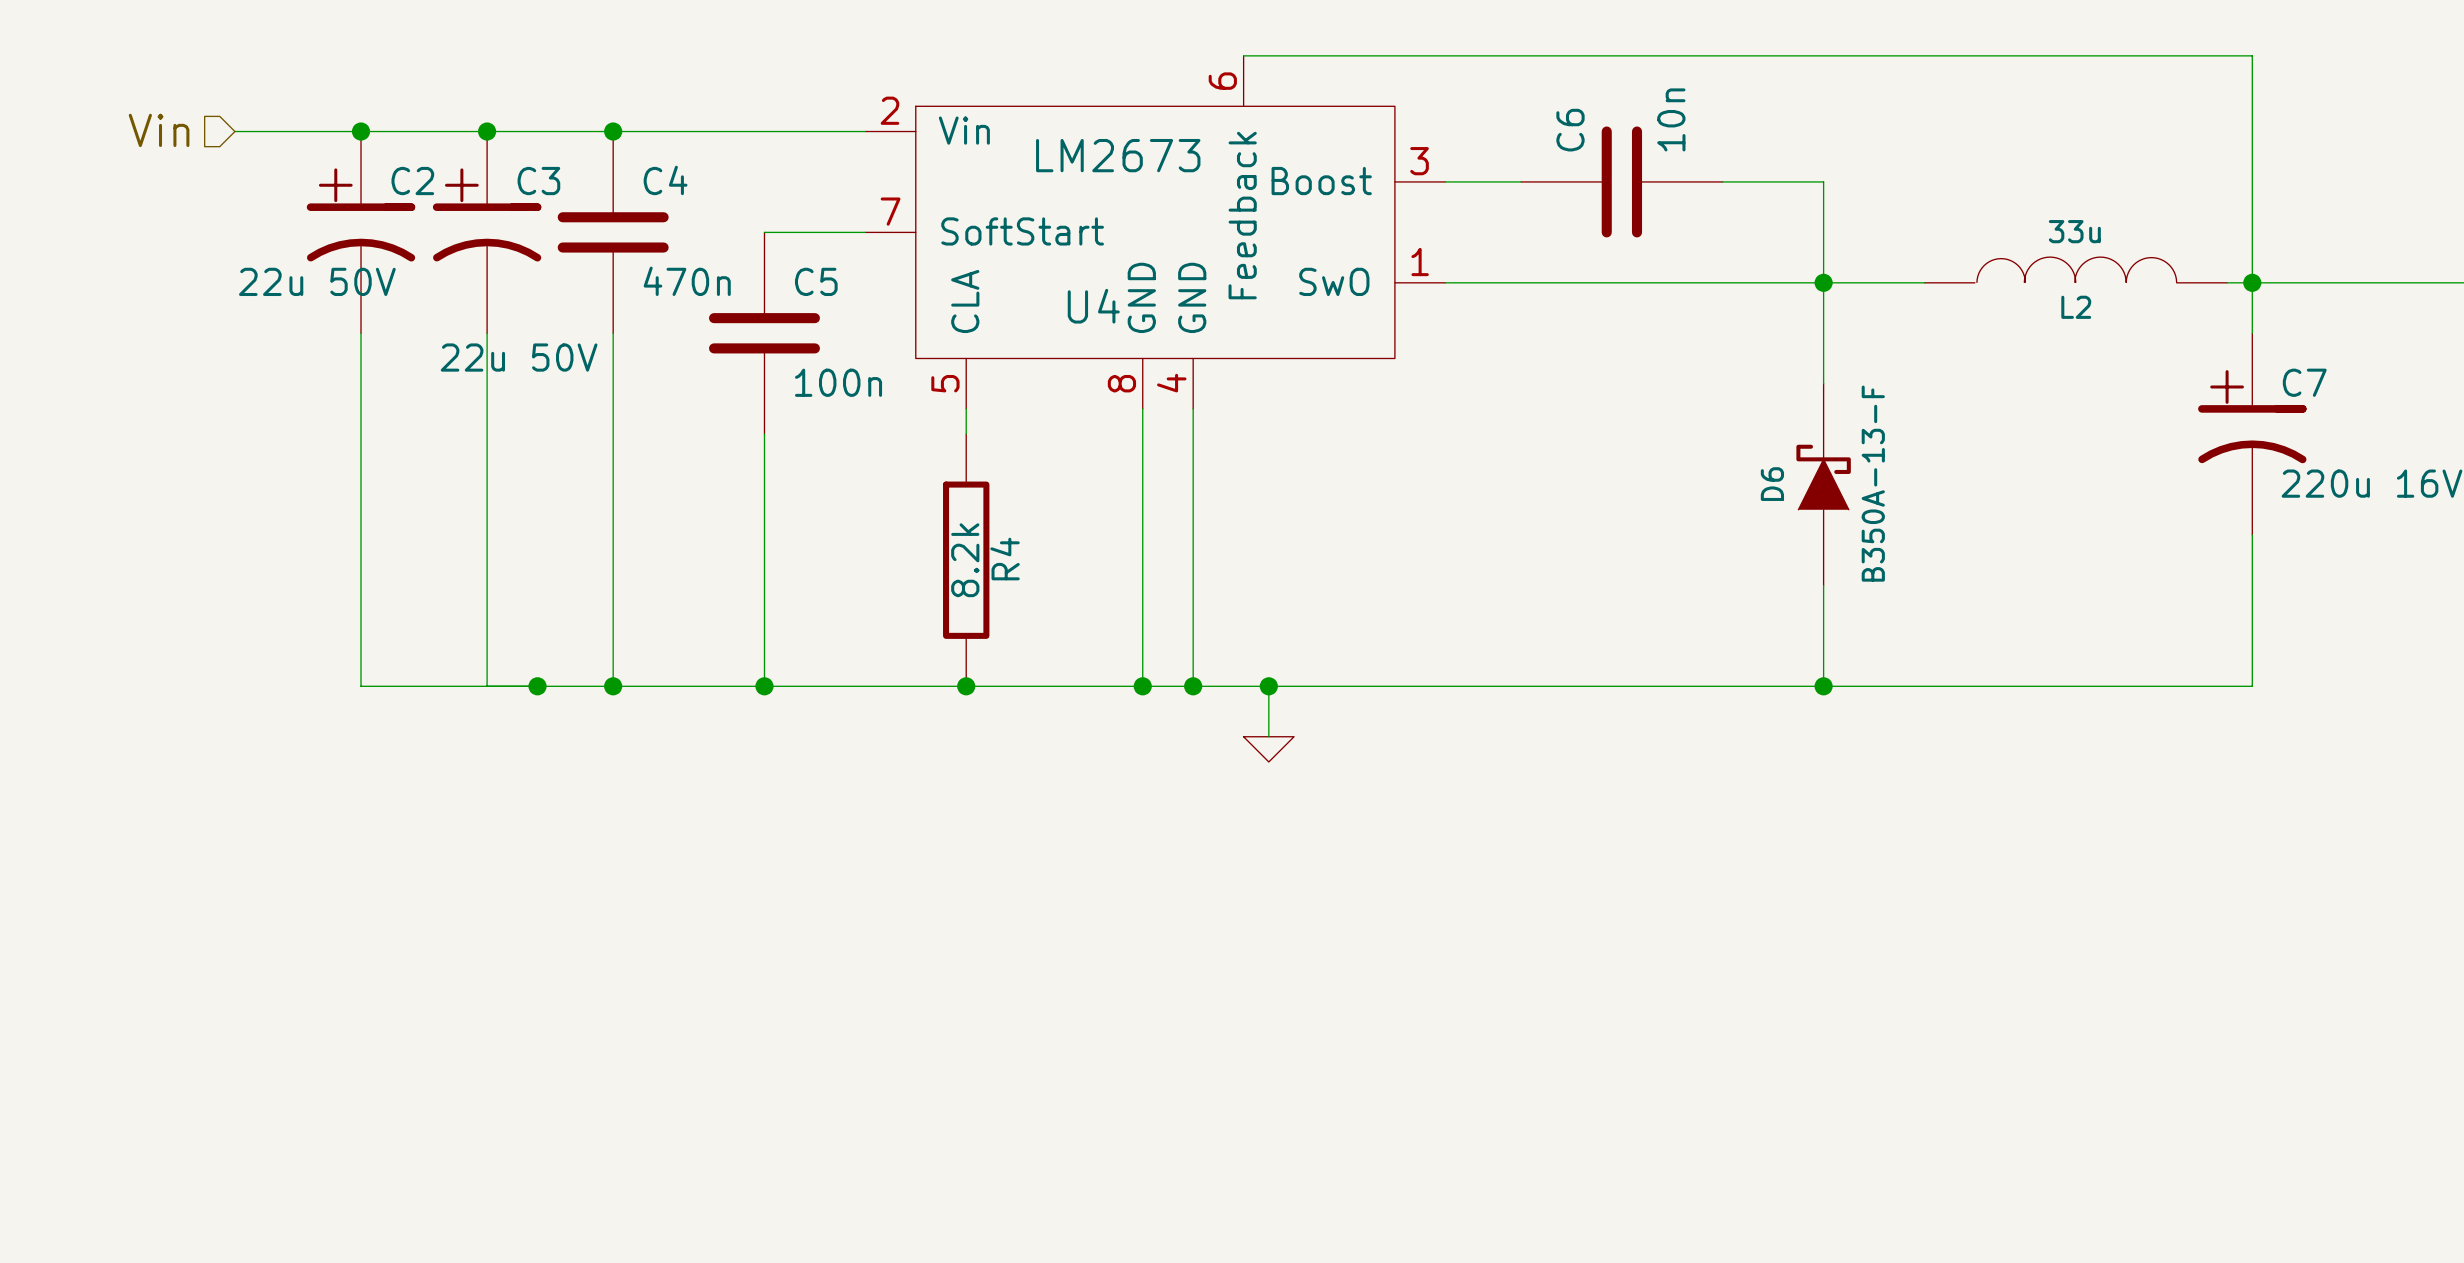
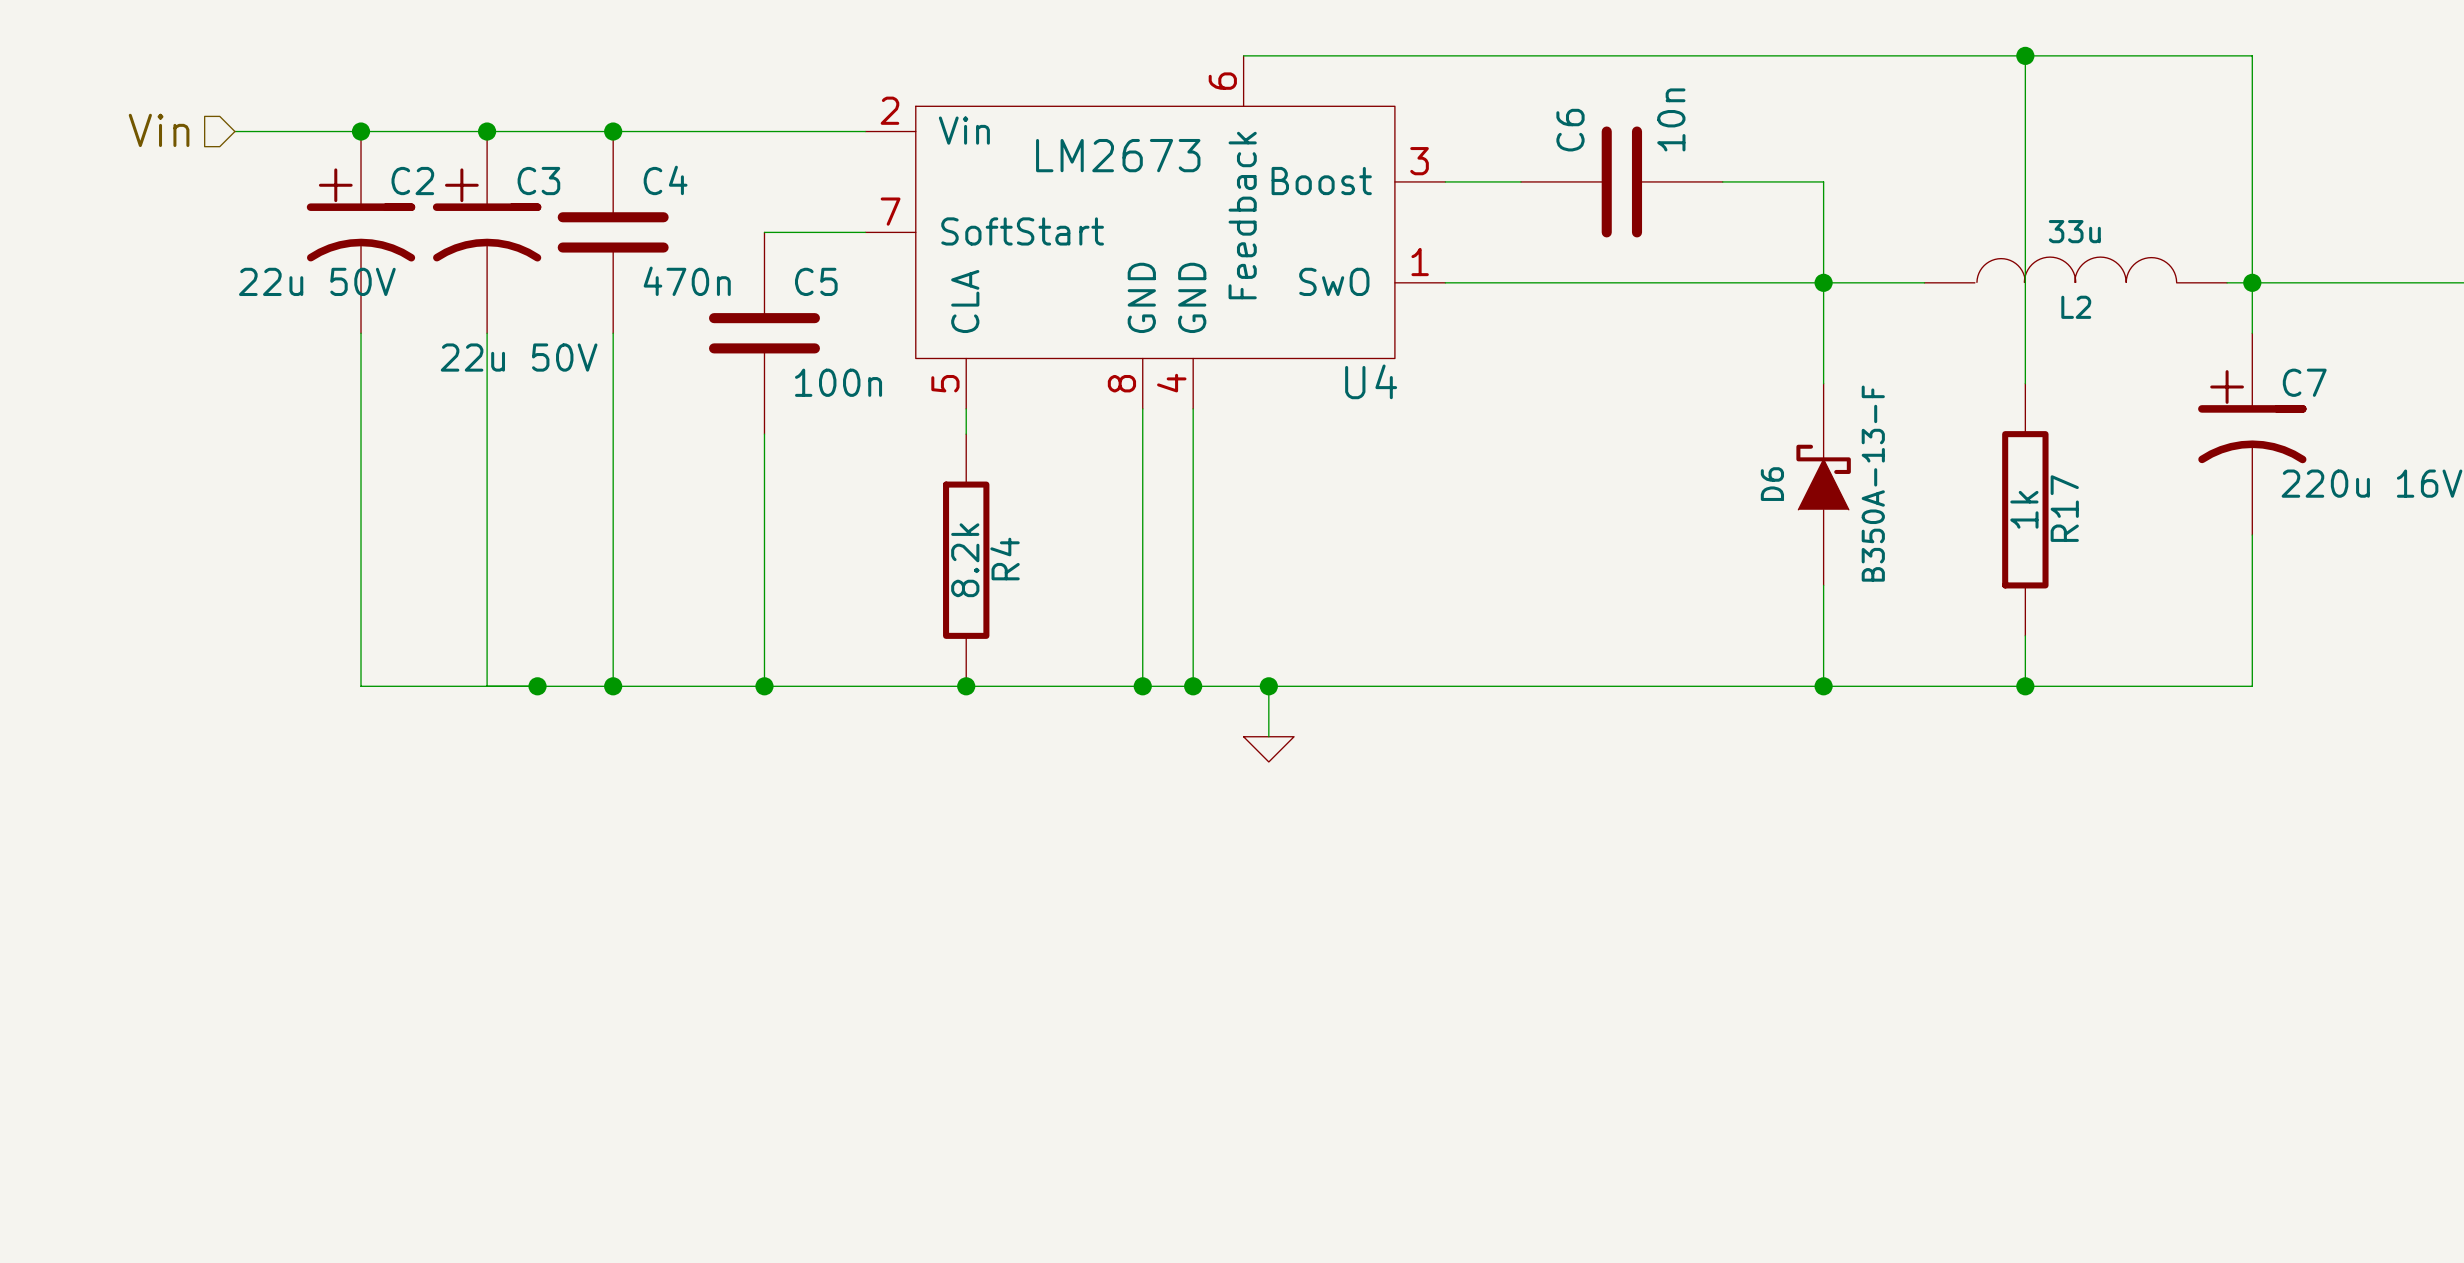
wire: none -> (2025, 55) (2025, 383)
junction: none -> (2025, 55)
U4 name position: U4 (1093, 306) -> U4 (1371, 381)
R17: none -> 1k (2025, 509)
wire: none -> (2025, 635) (2025, 686)
junction: none -> (2025, 686)

